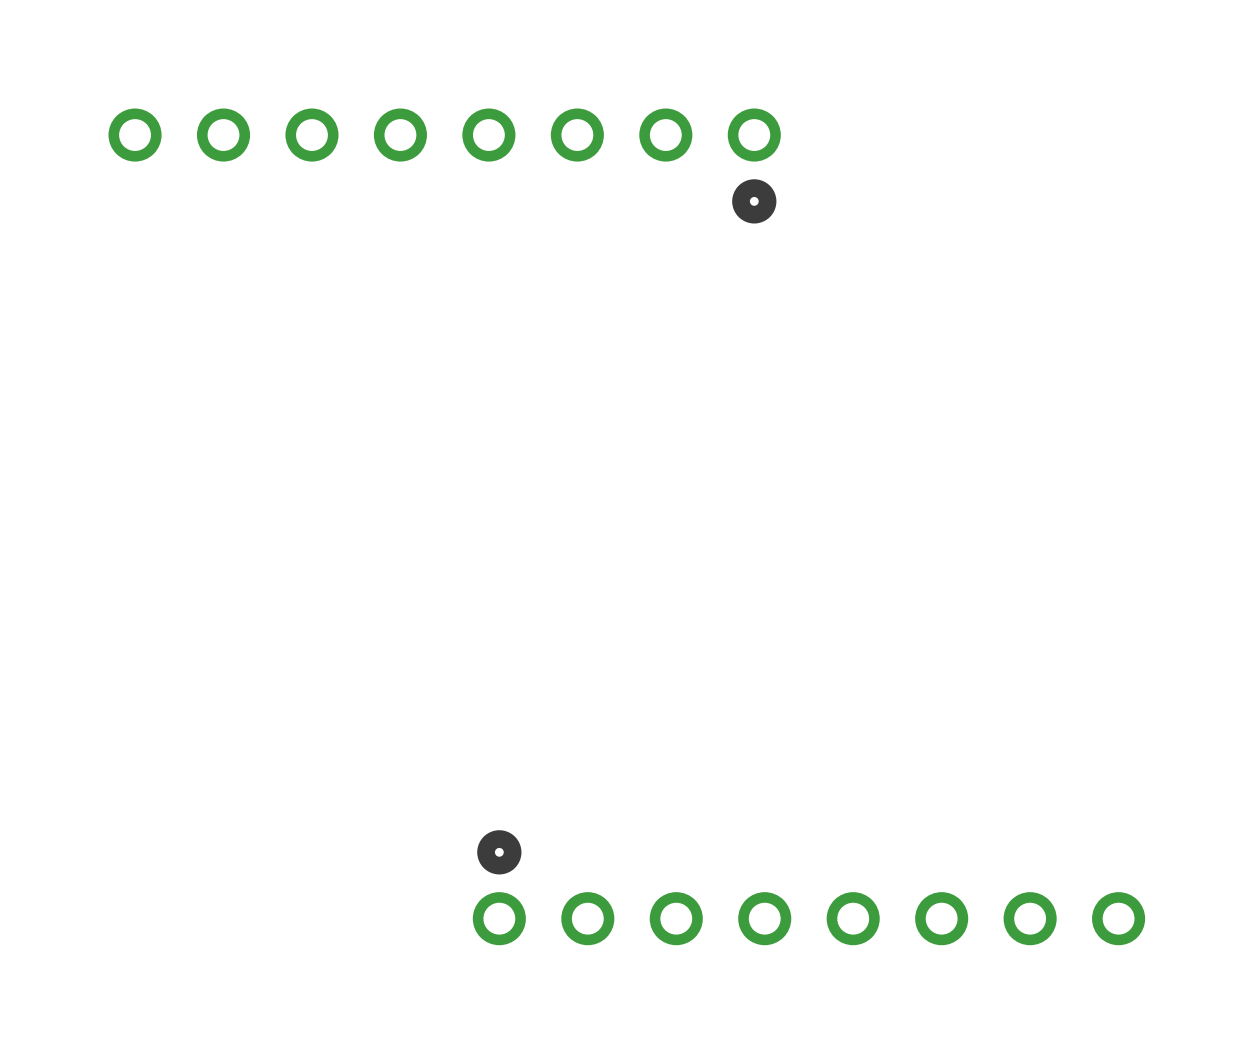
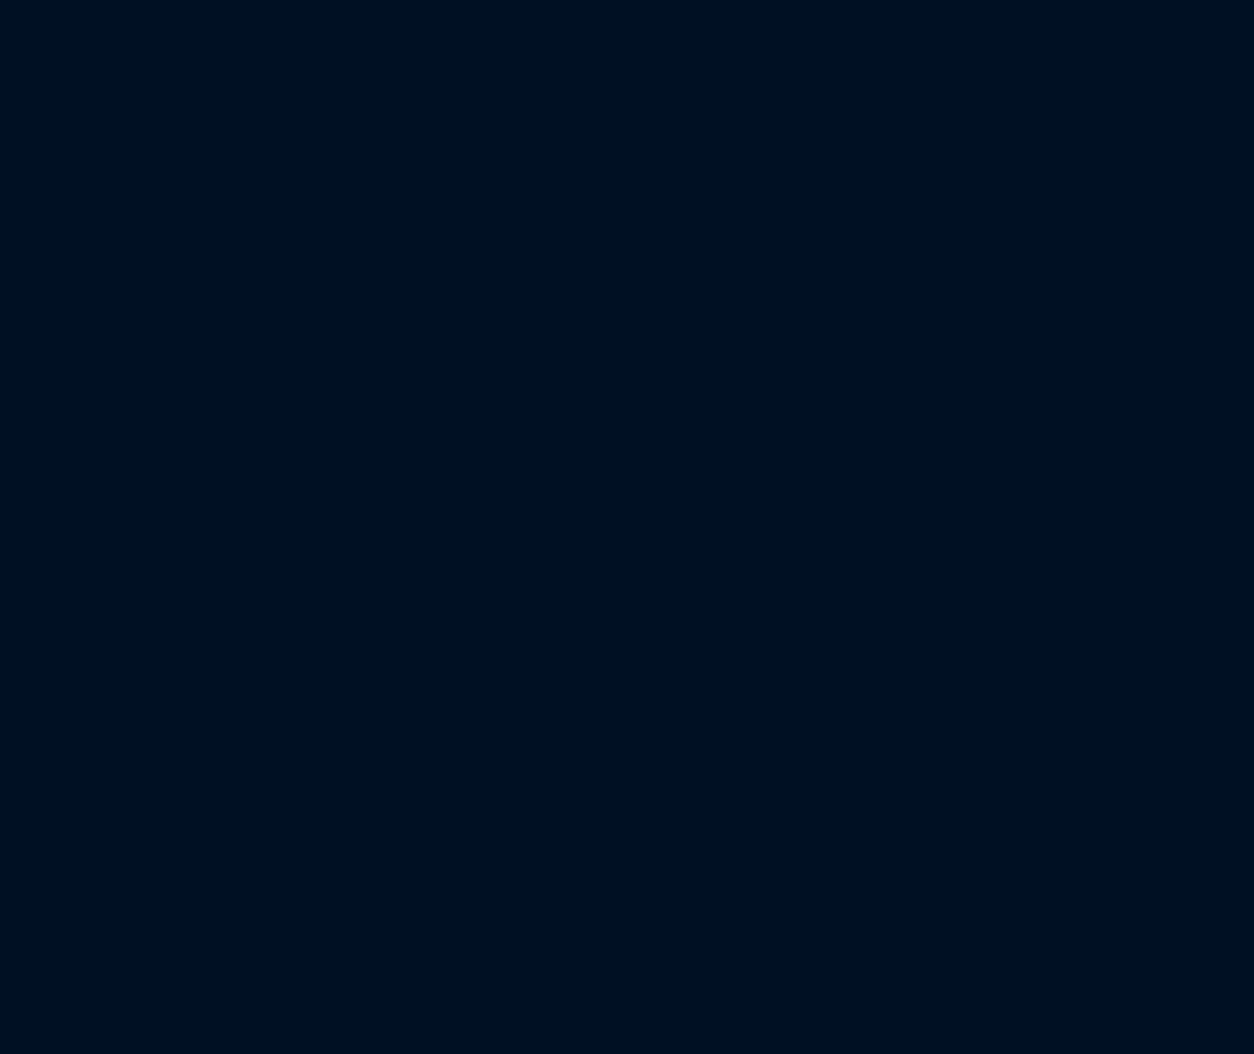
part: (444, 166) -> none
part: (808, 887) -> none

